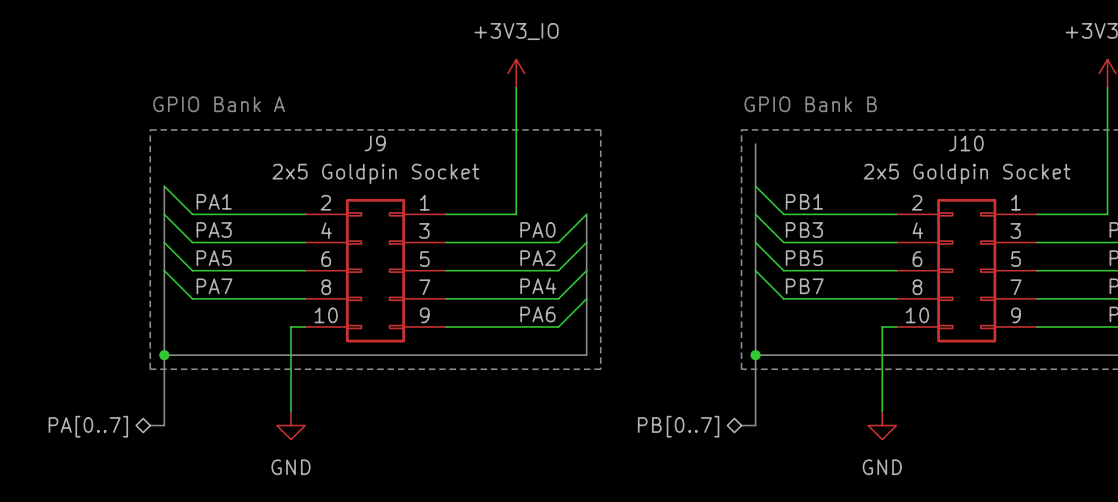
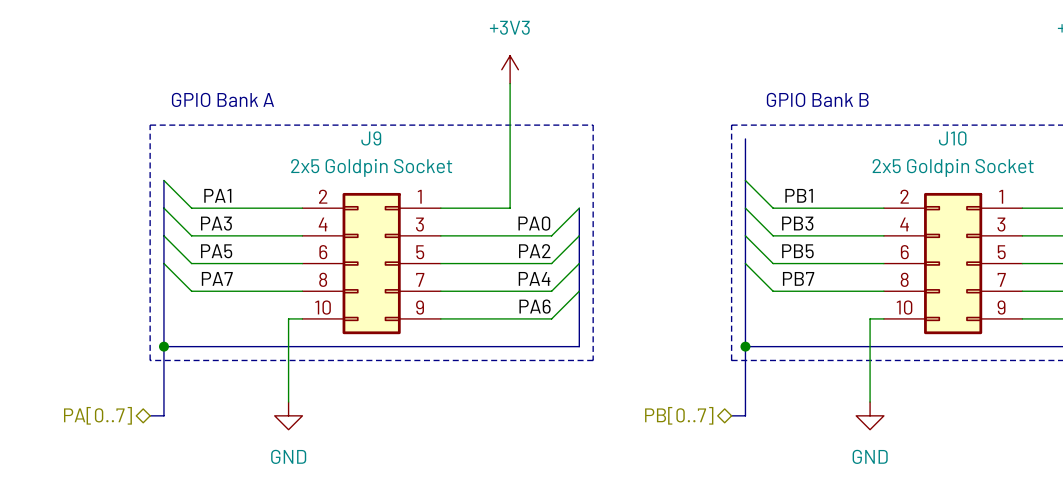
power symbol: +3V3_IO (516, 73) -> +3V3 (510, 69)
text position: GPIO Bank A (219, 104) -> GPIO Bank A (222, 99)
text position: GPIO Bank B (810, 104) -> GPIO Bank B (817, 99)

